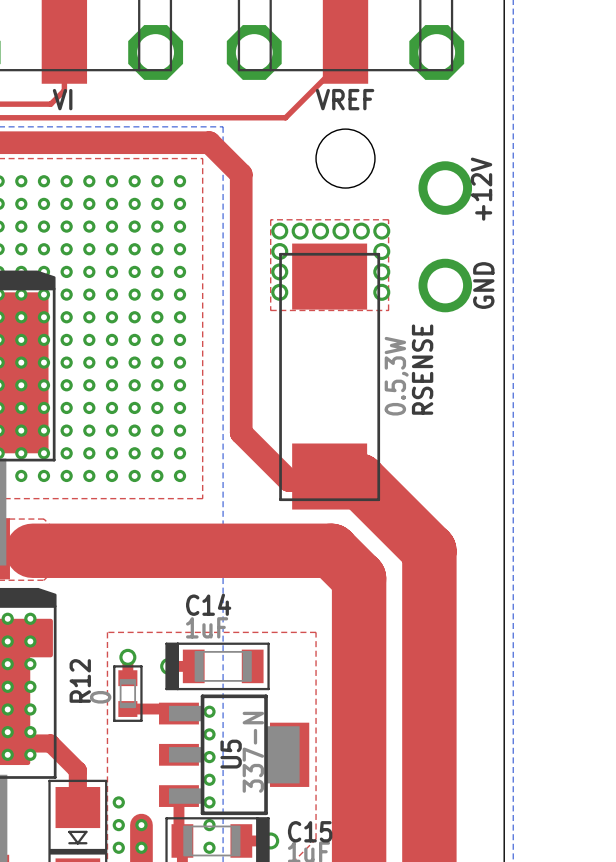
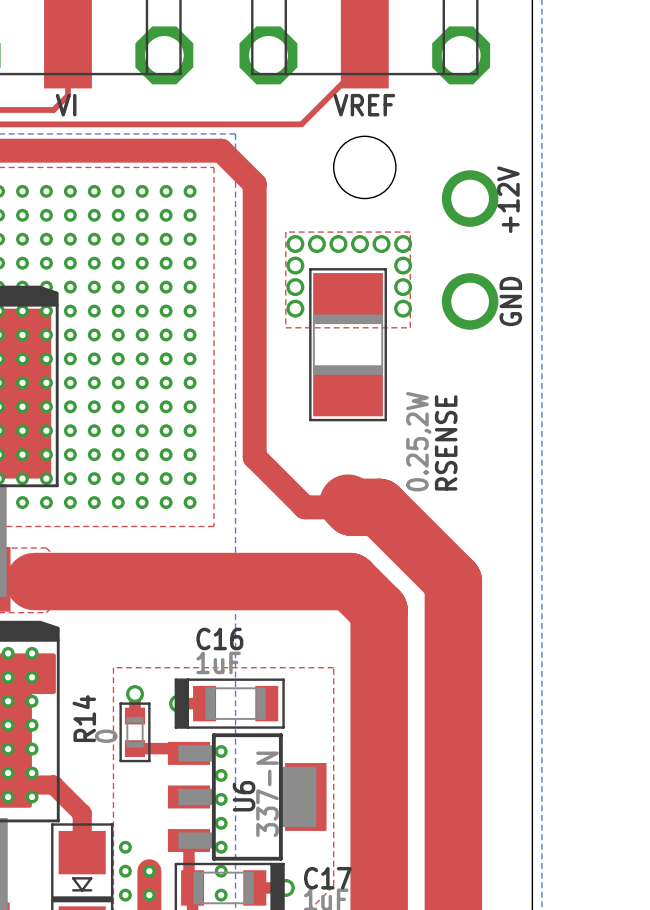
RSENSE: none -> 0.25,2W (348, 344)
RSENSE: 0.5,3W (329, 376) -> none
C14 name: C14 (208, 604) -> C16 (219, 638)
R12 name: R12 (80, 680) -> R14 (84, 718)
U5 name: U5 (231, 754) -> U6 (244, 796)
C15 name: C15 (310, 831) -> C17 (327, 878)

